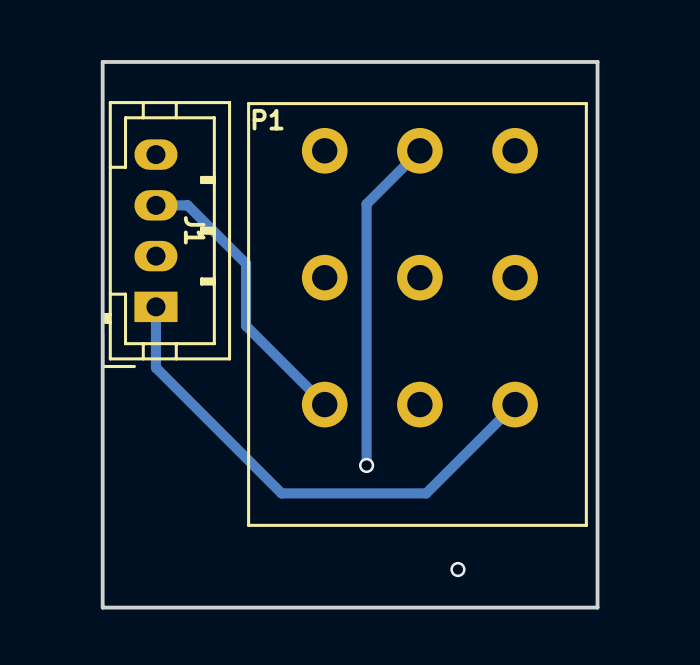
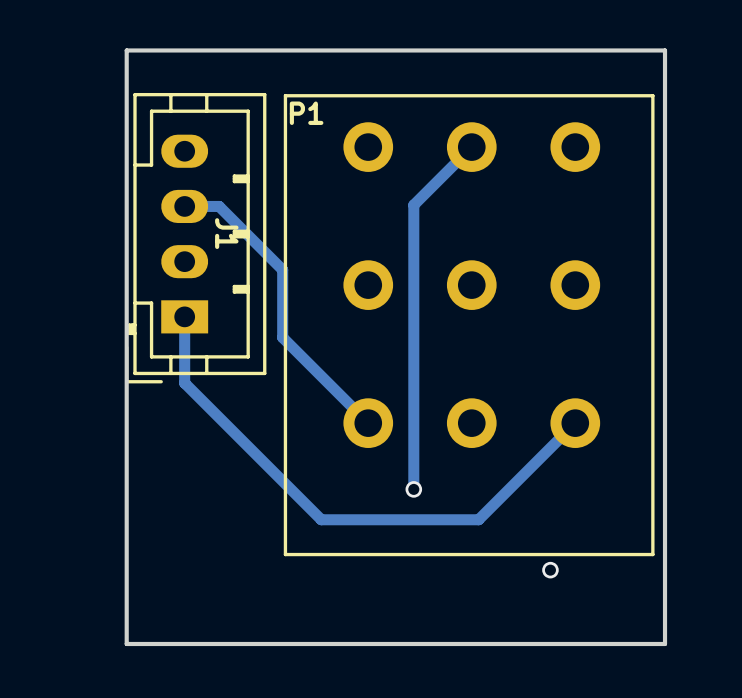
via position: (457, 569) -> (550, 570)

